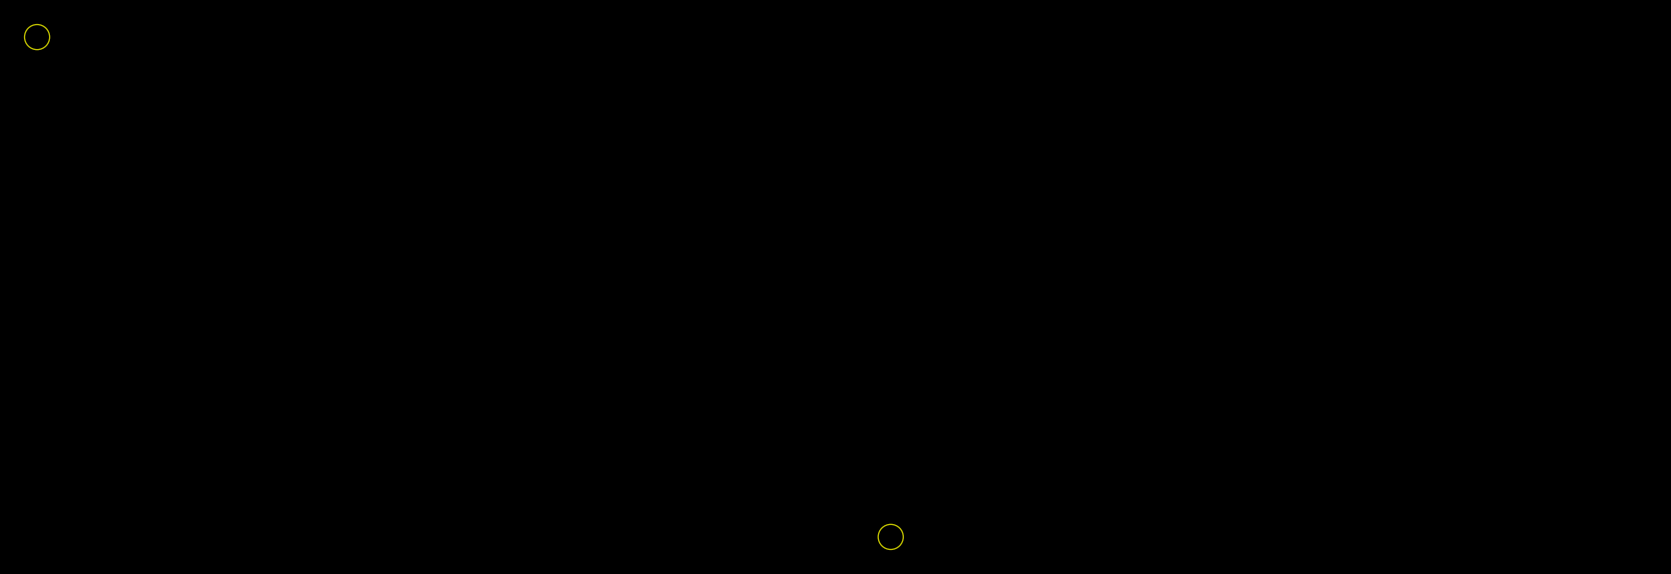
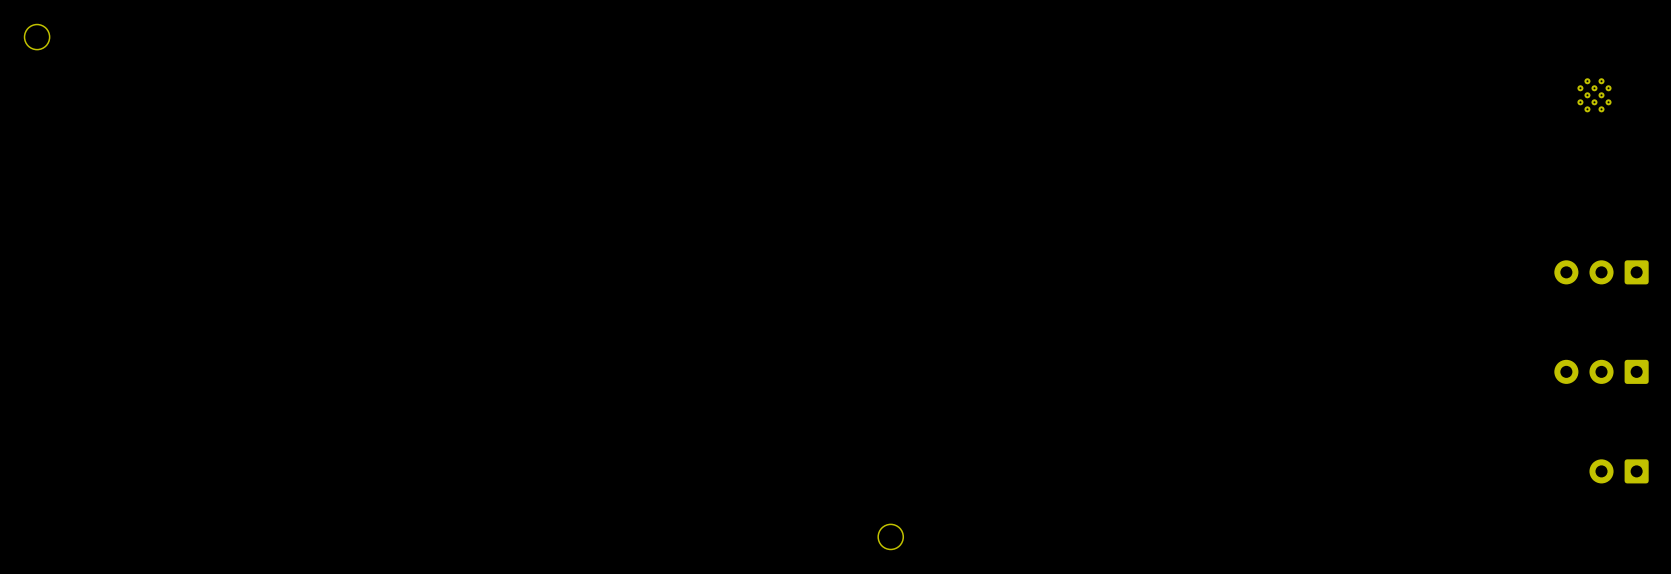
part: none -> (1594, 95)
part: none -> (1601, 272)
part: none -> (1601, 371)
part: none -> (1619, 471)

